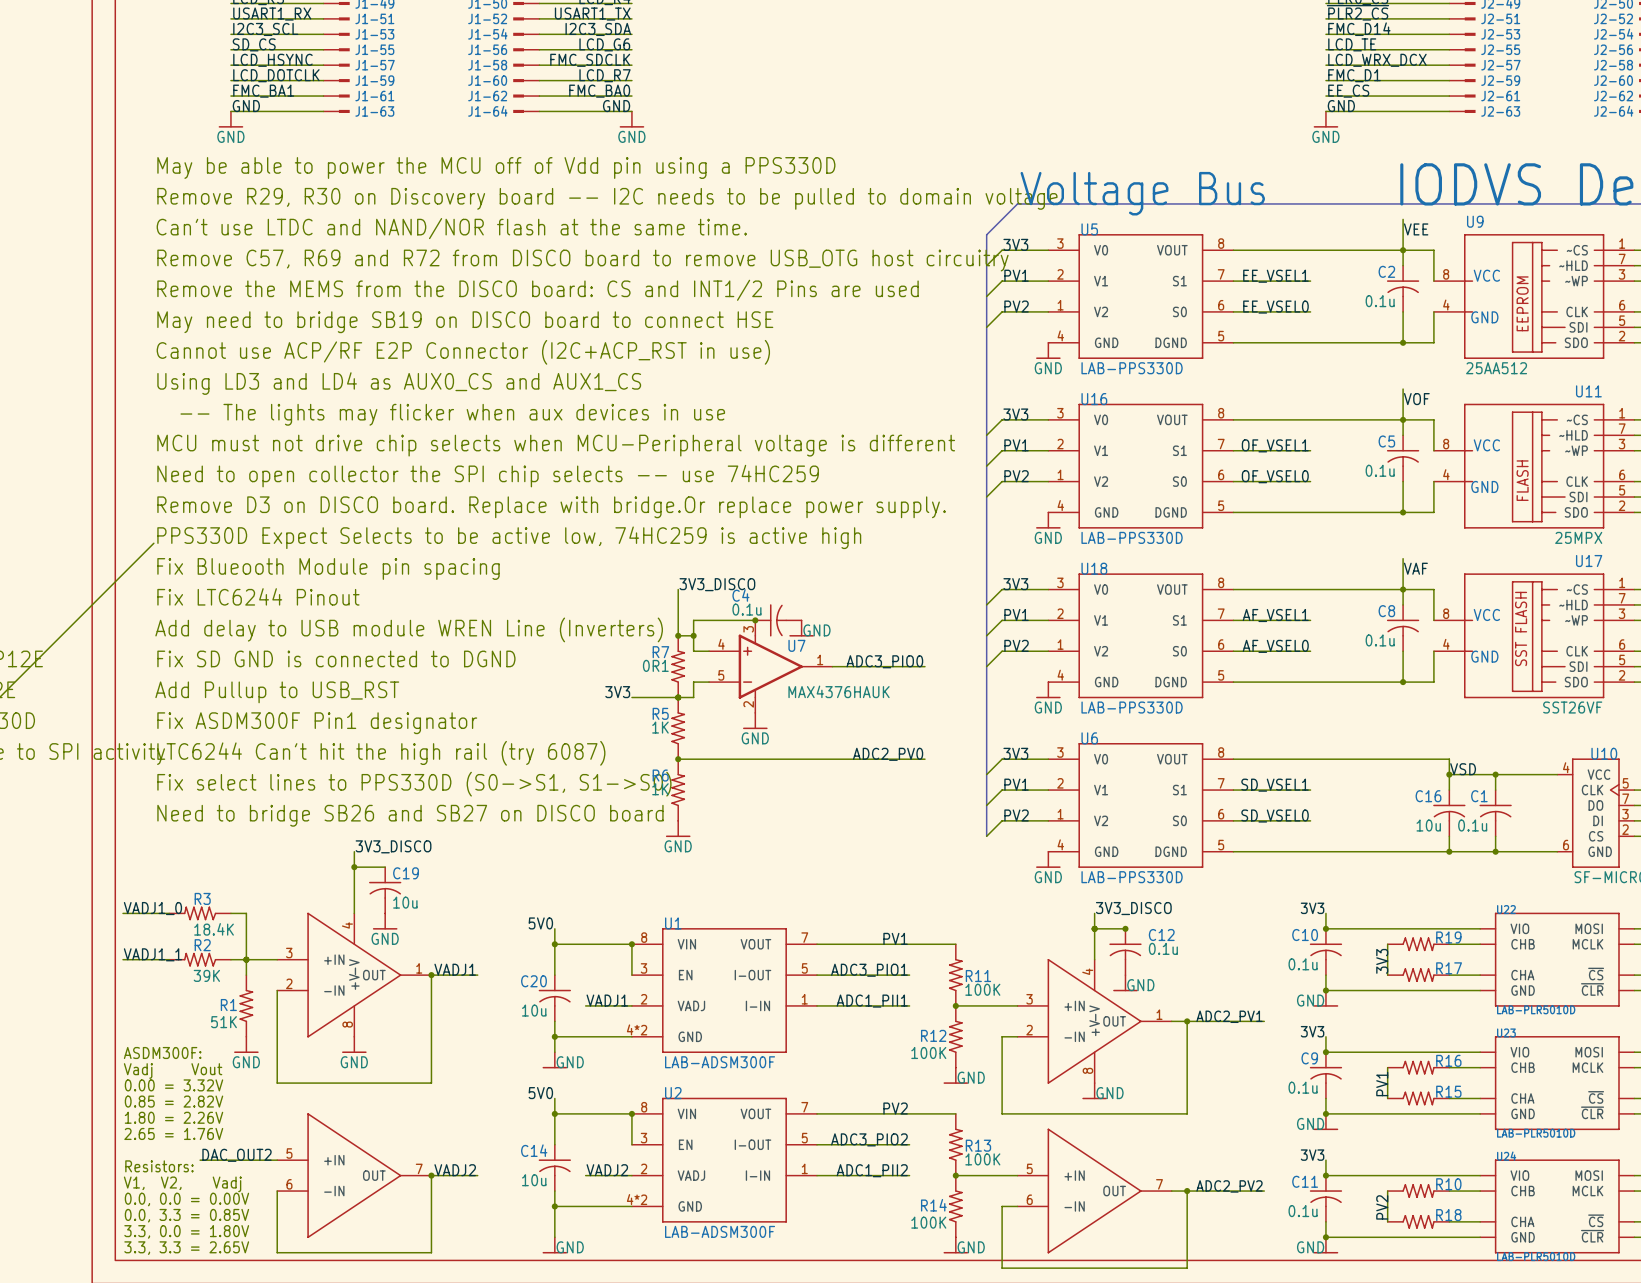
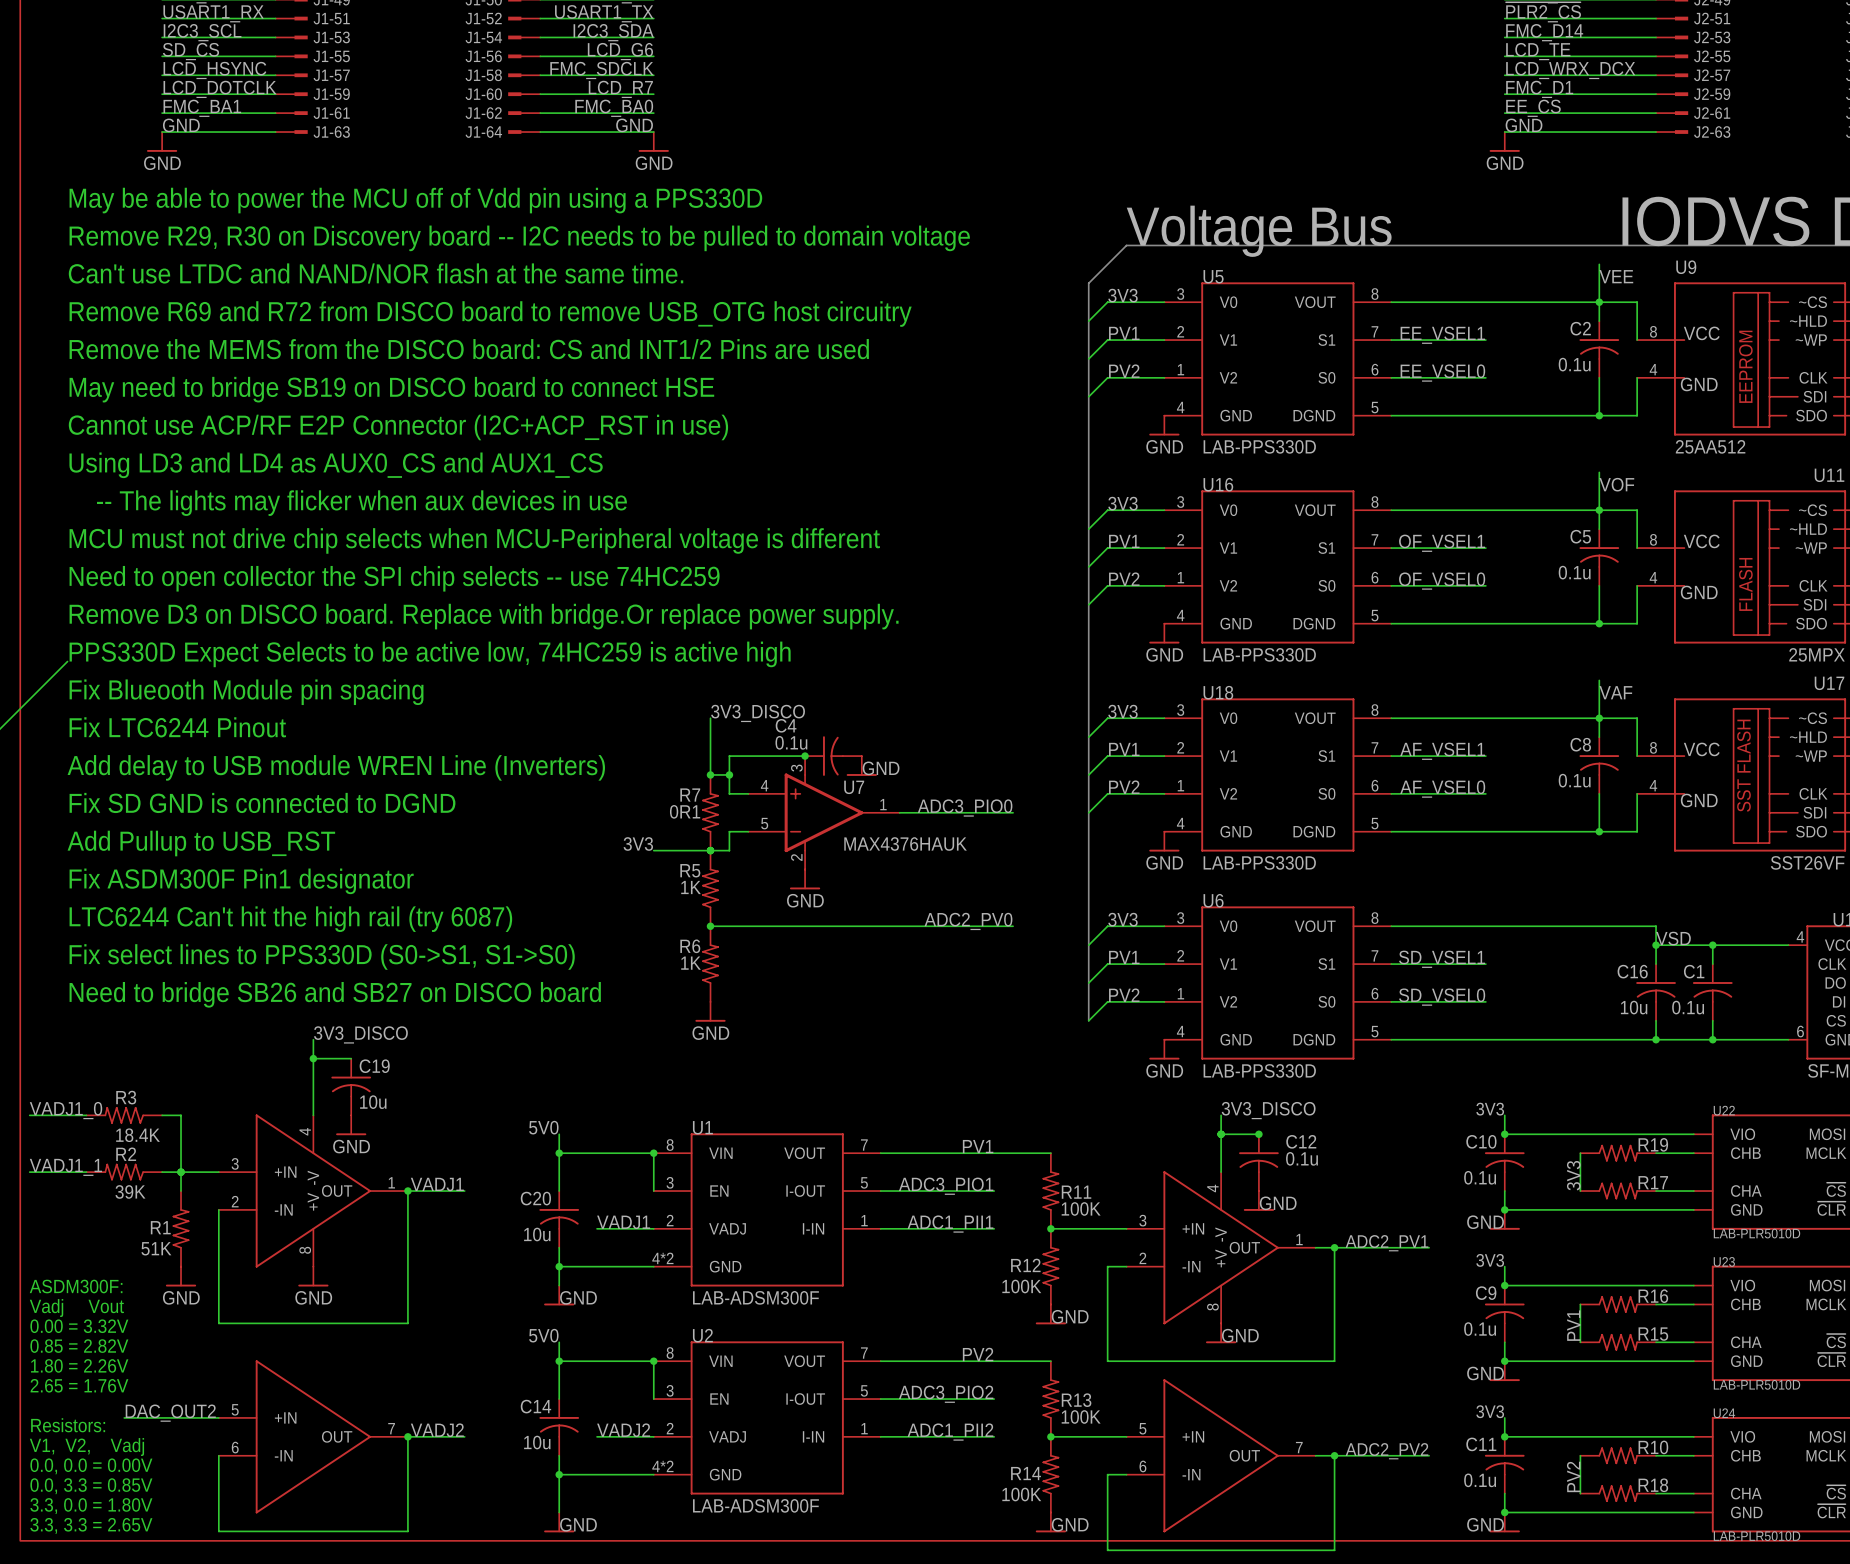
text: Remove C57, R69 and R72 from DISCO board to remove USB_OTG host circuitry (582, 260) -> Remove R69 and R72 from DISCO board to remove USB_OTG host circuitry (490, 314)

